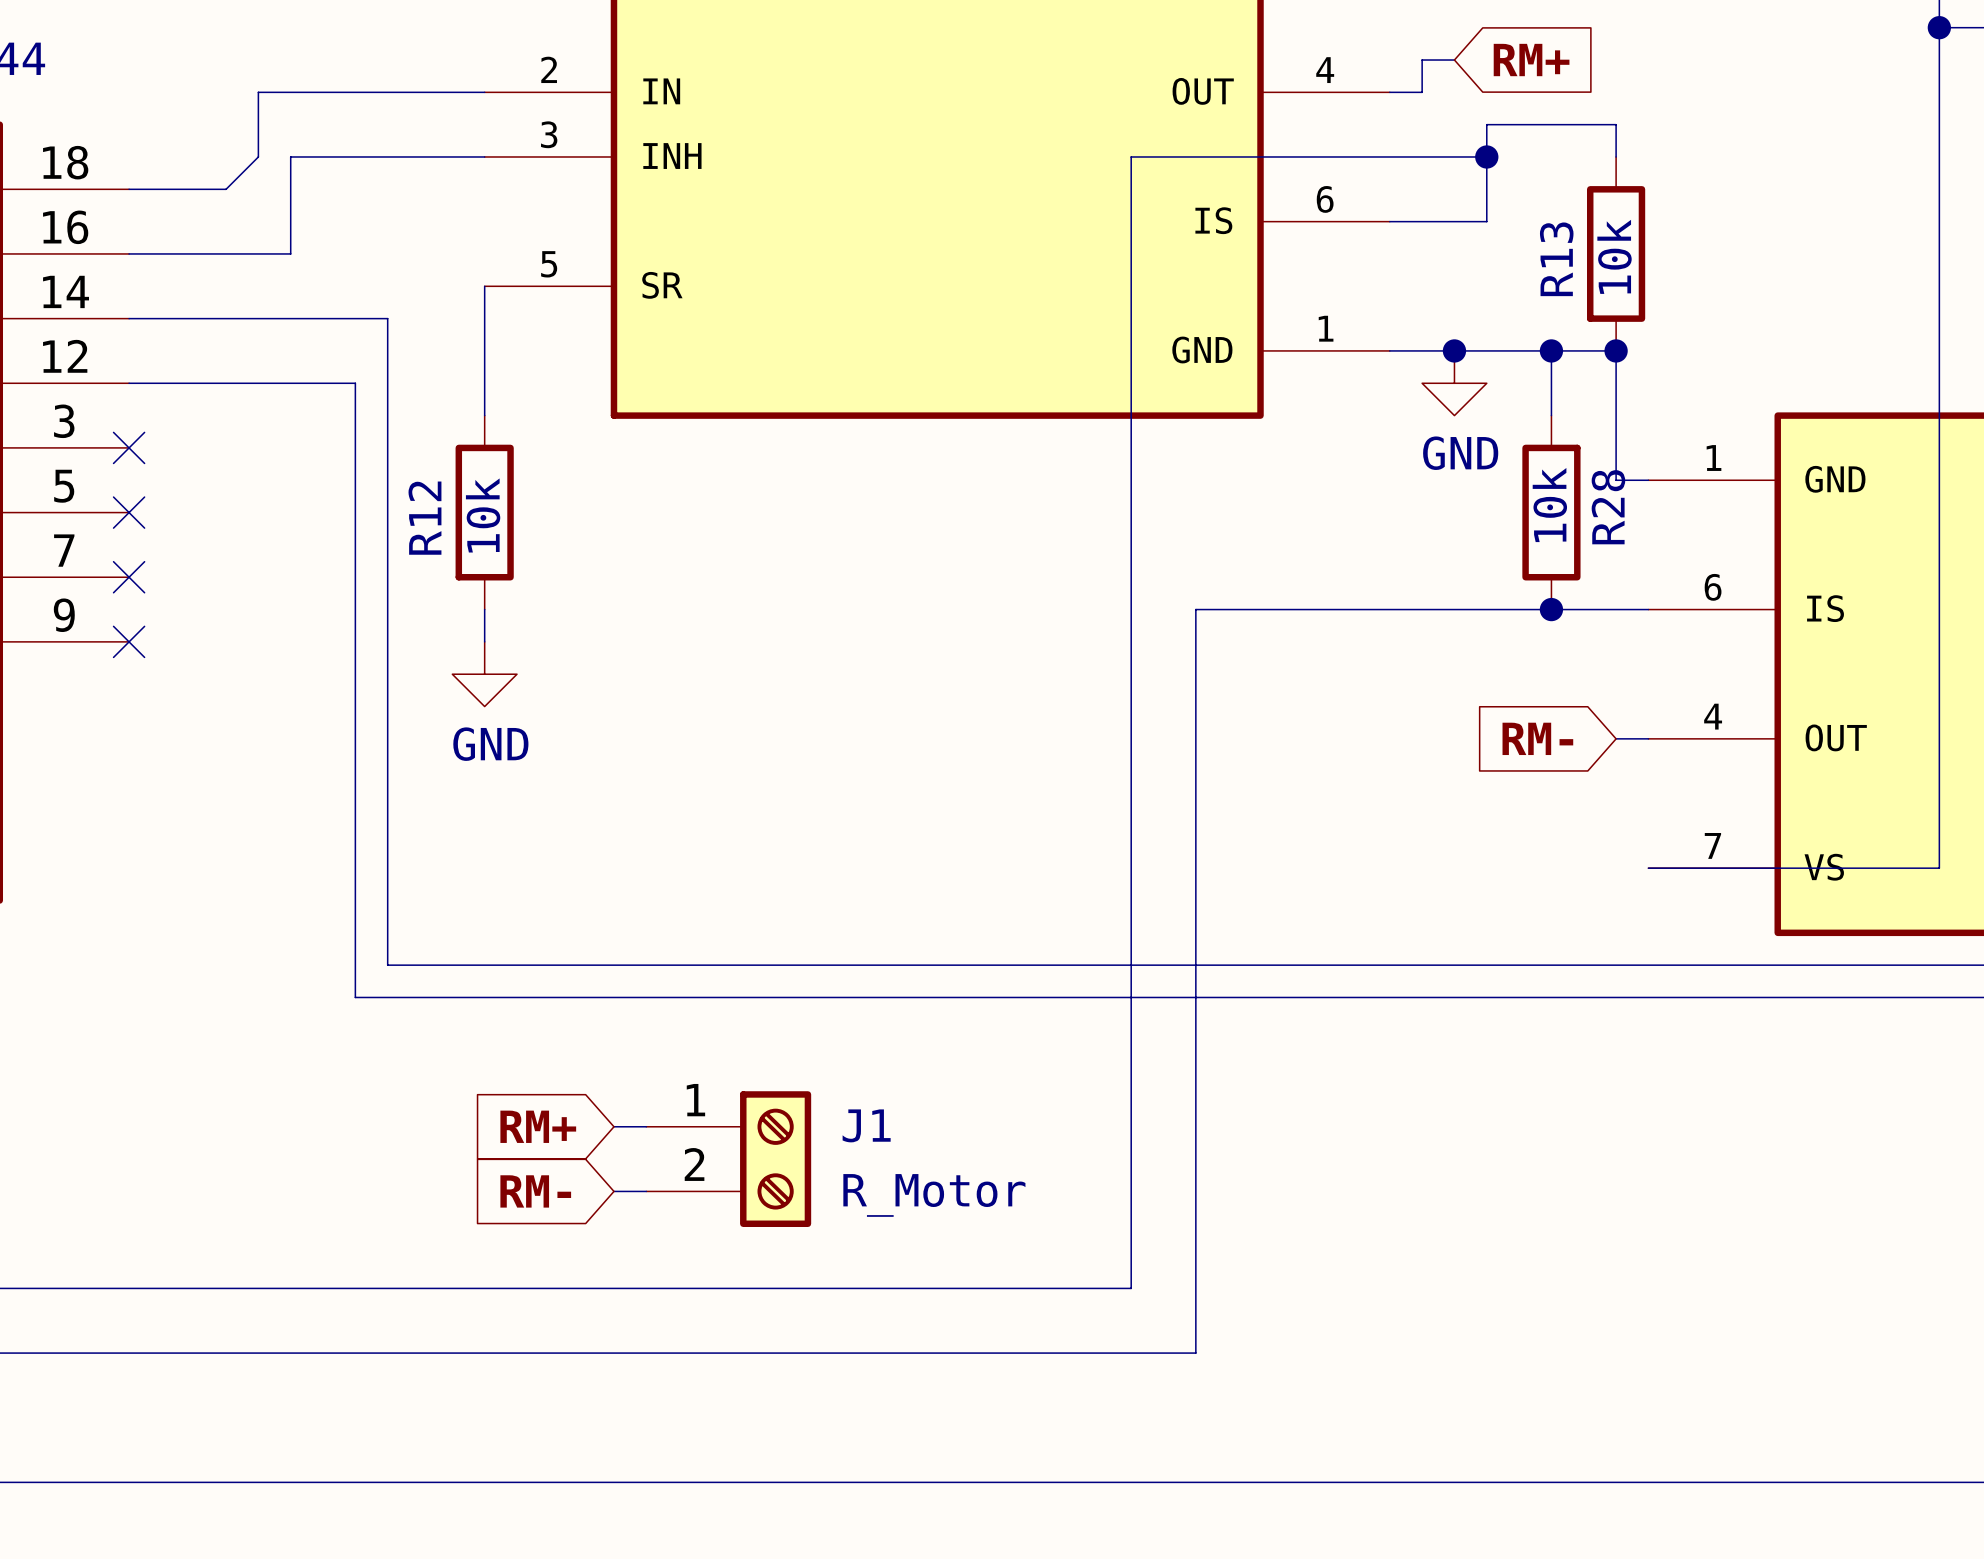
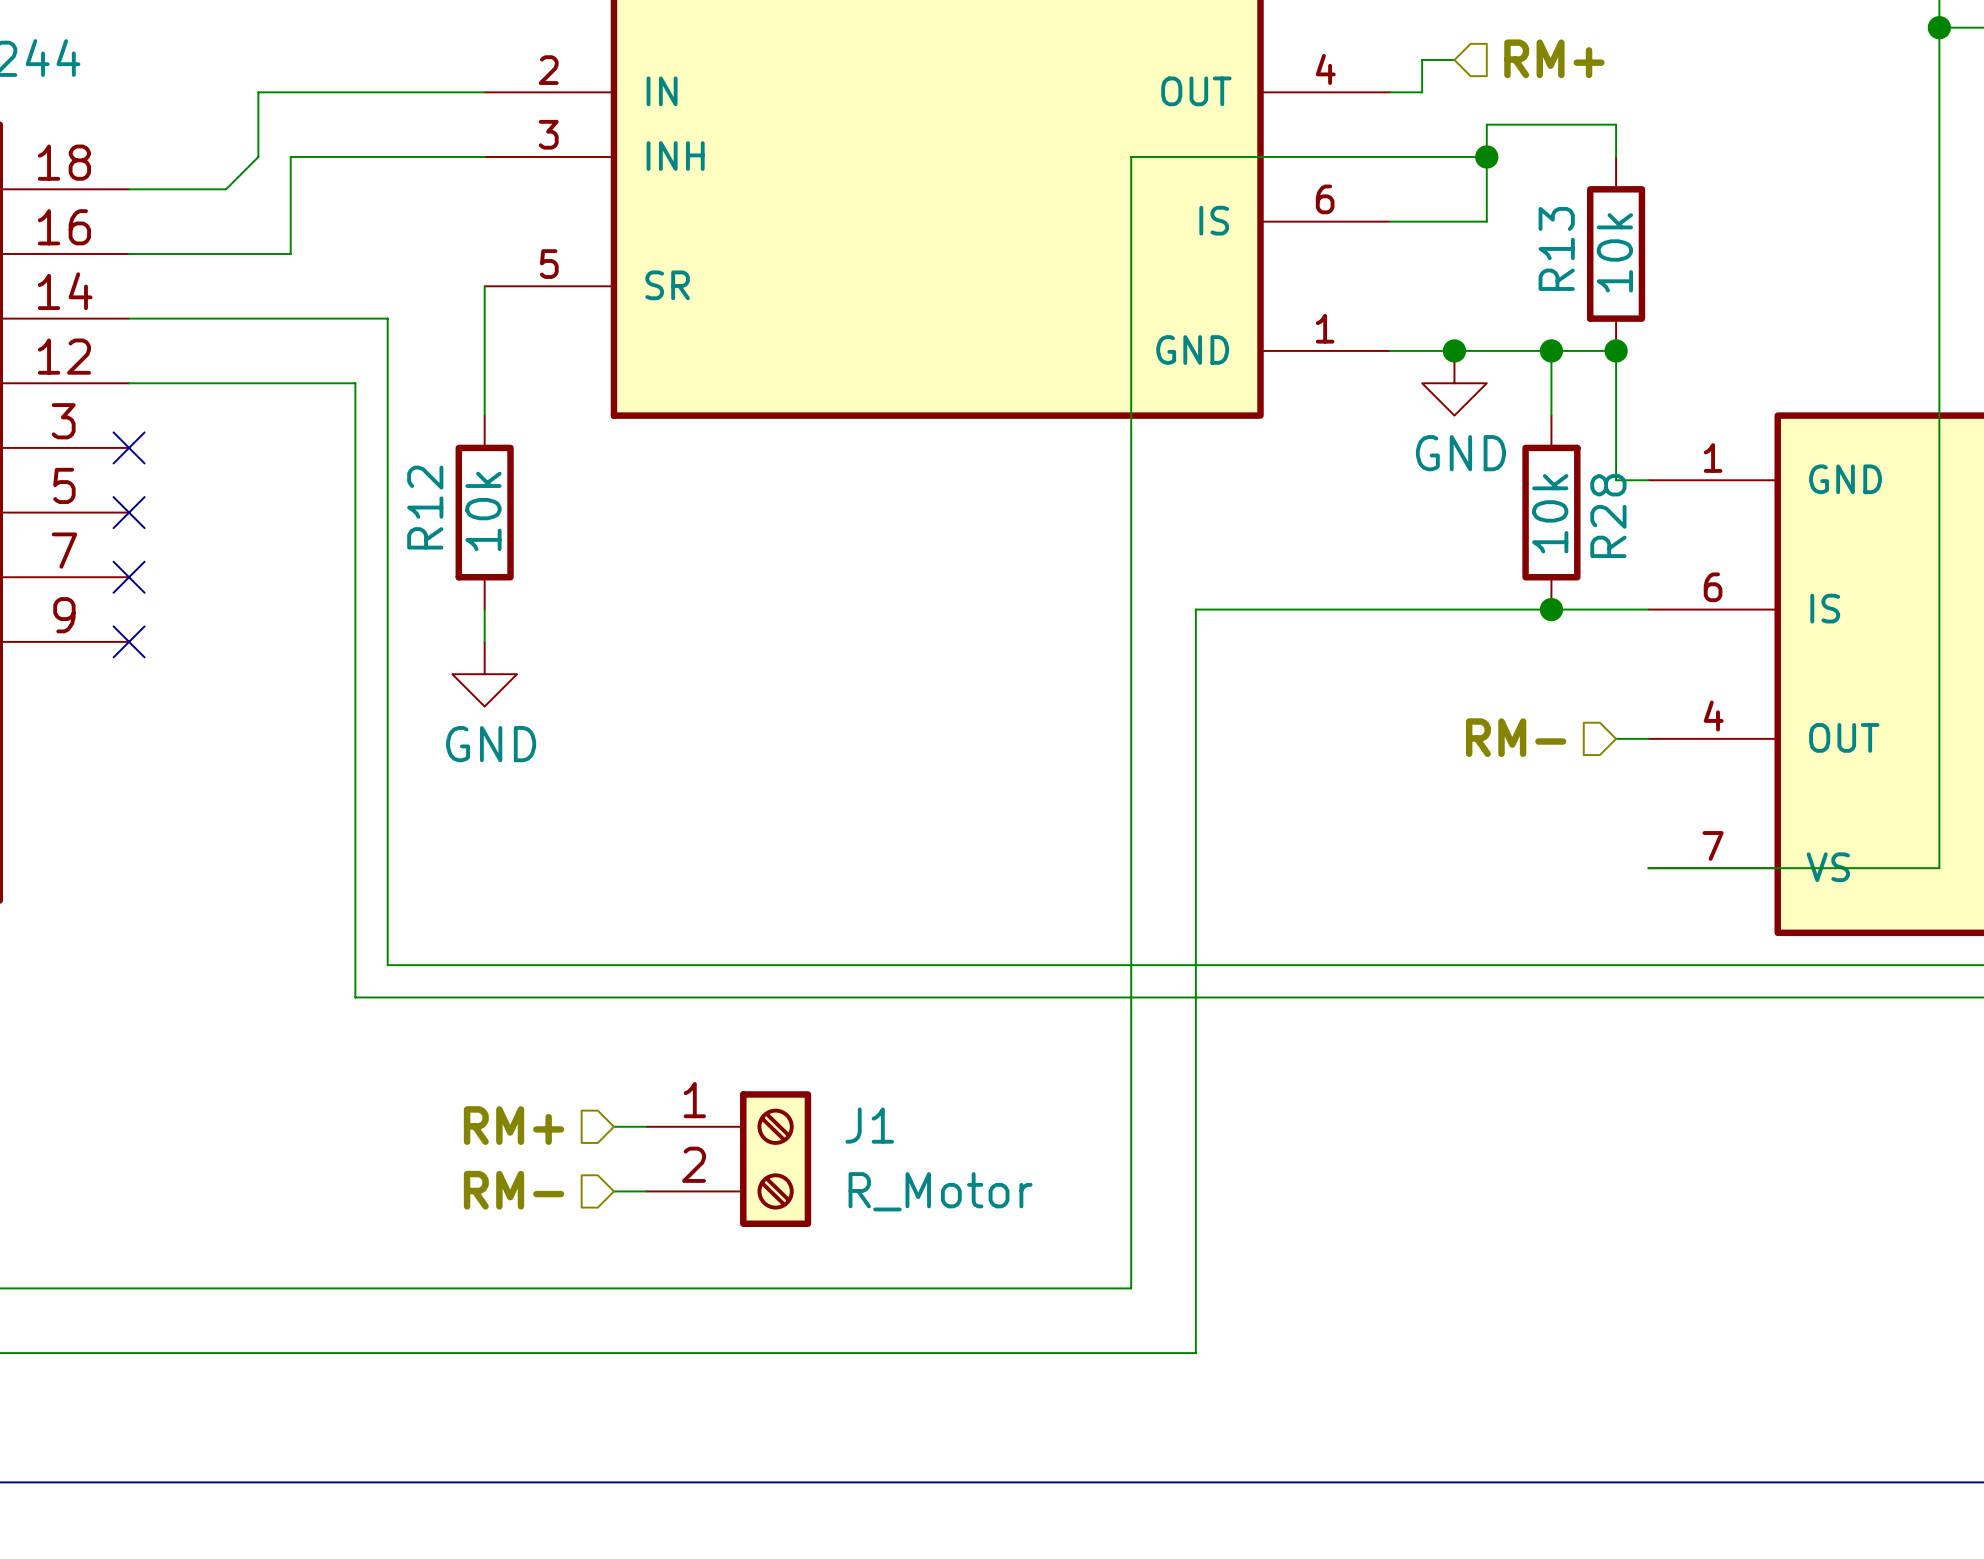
hierarchical label: none -> RM+ (1554, 58)
global label: RM+ (1531, 60) -> none
hierarchical label: none -> RM- (1516, 737)
global label: RM- (1537, 738) -> none
hierarchical label: none -> RM+ (514, 1125)
global label: RM+ (538, 1126) -> none
hierarchical label: none -> RM- (514, 1190)
global label: RM- (535, 1191) -> none

